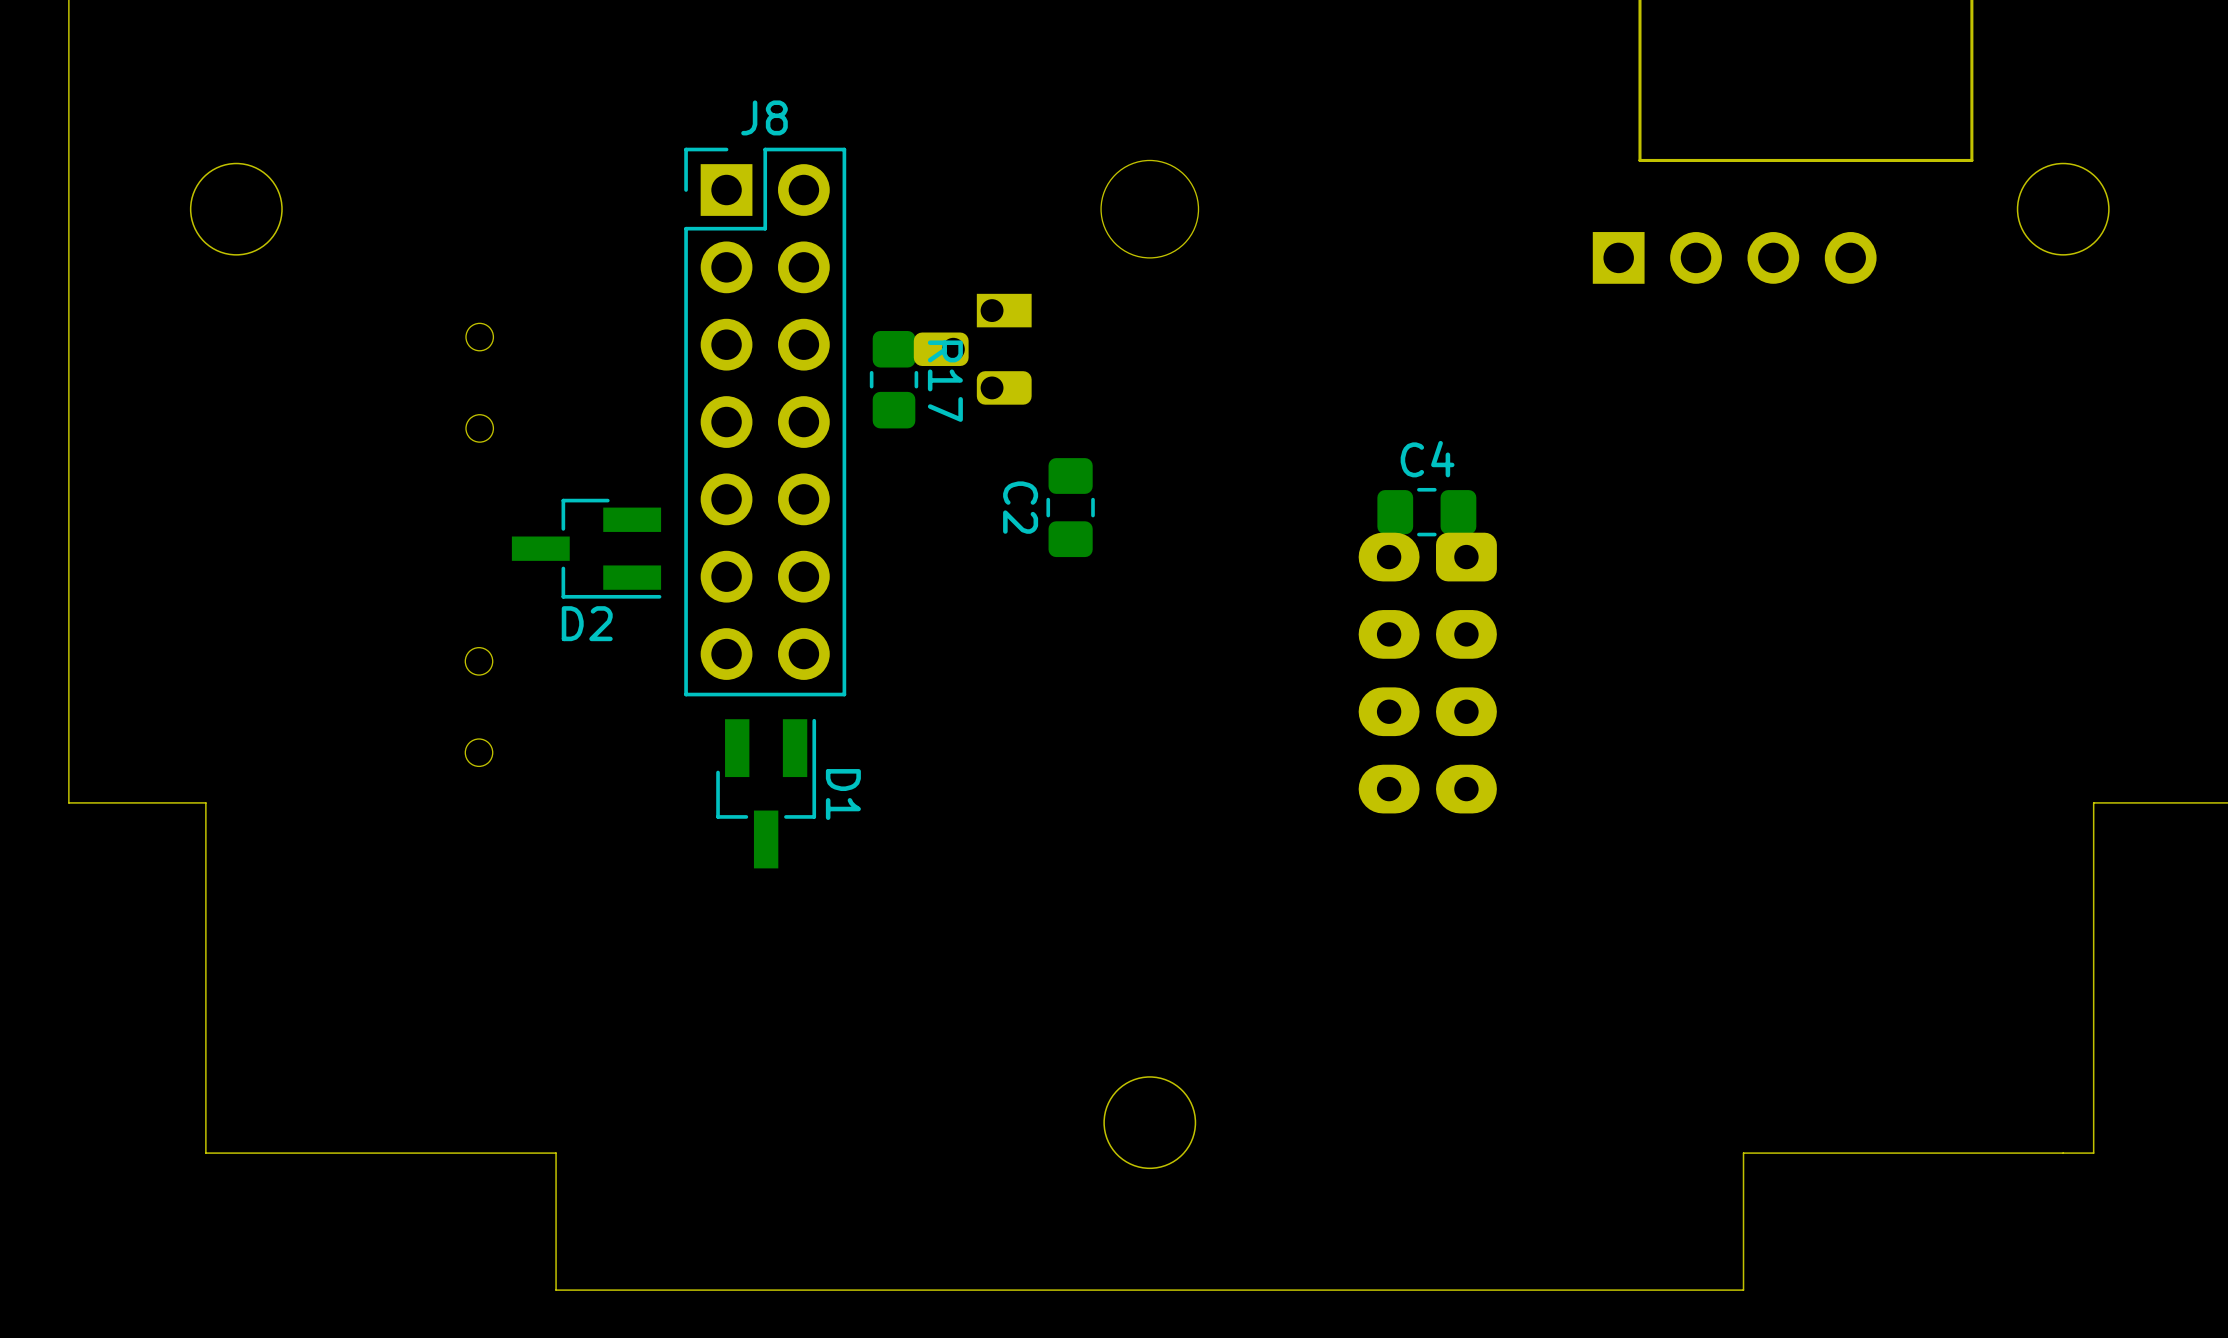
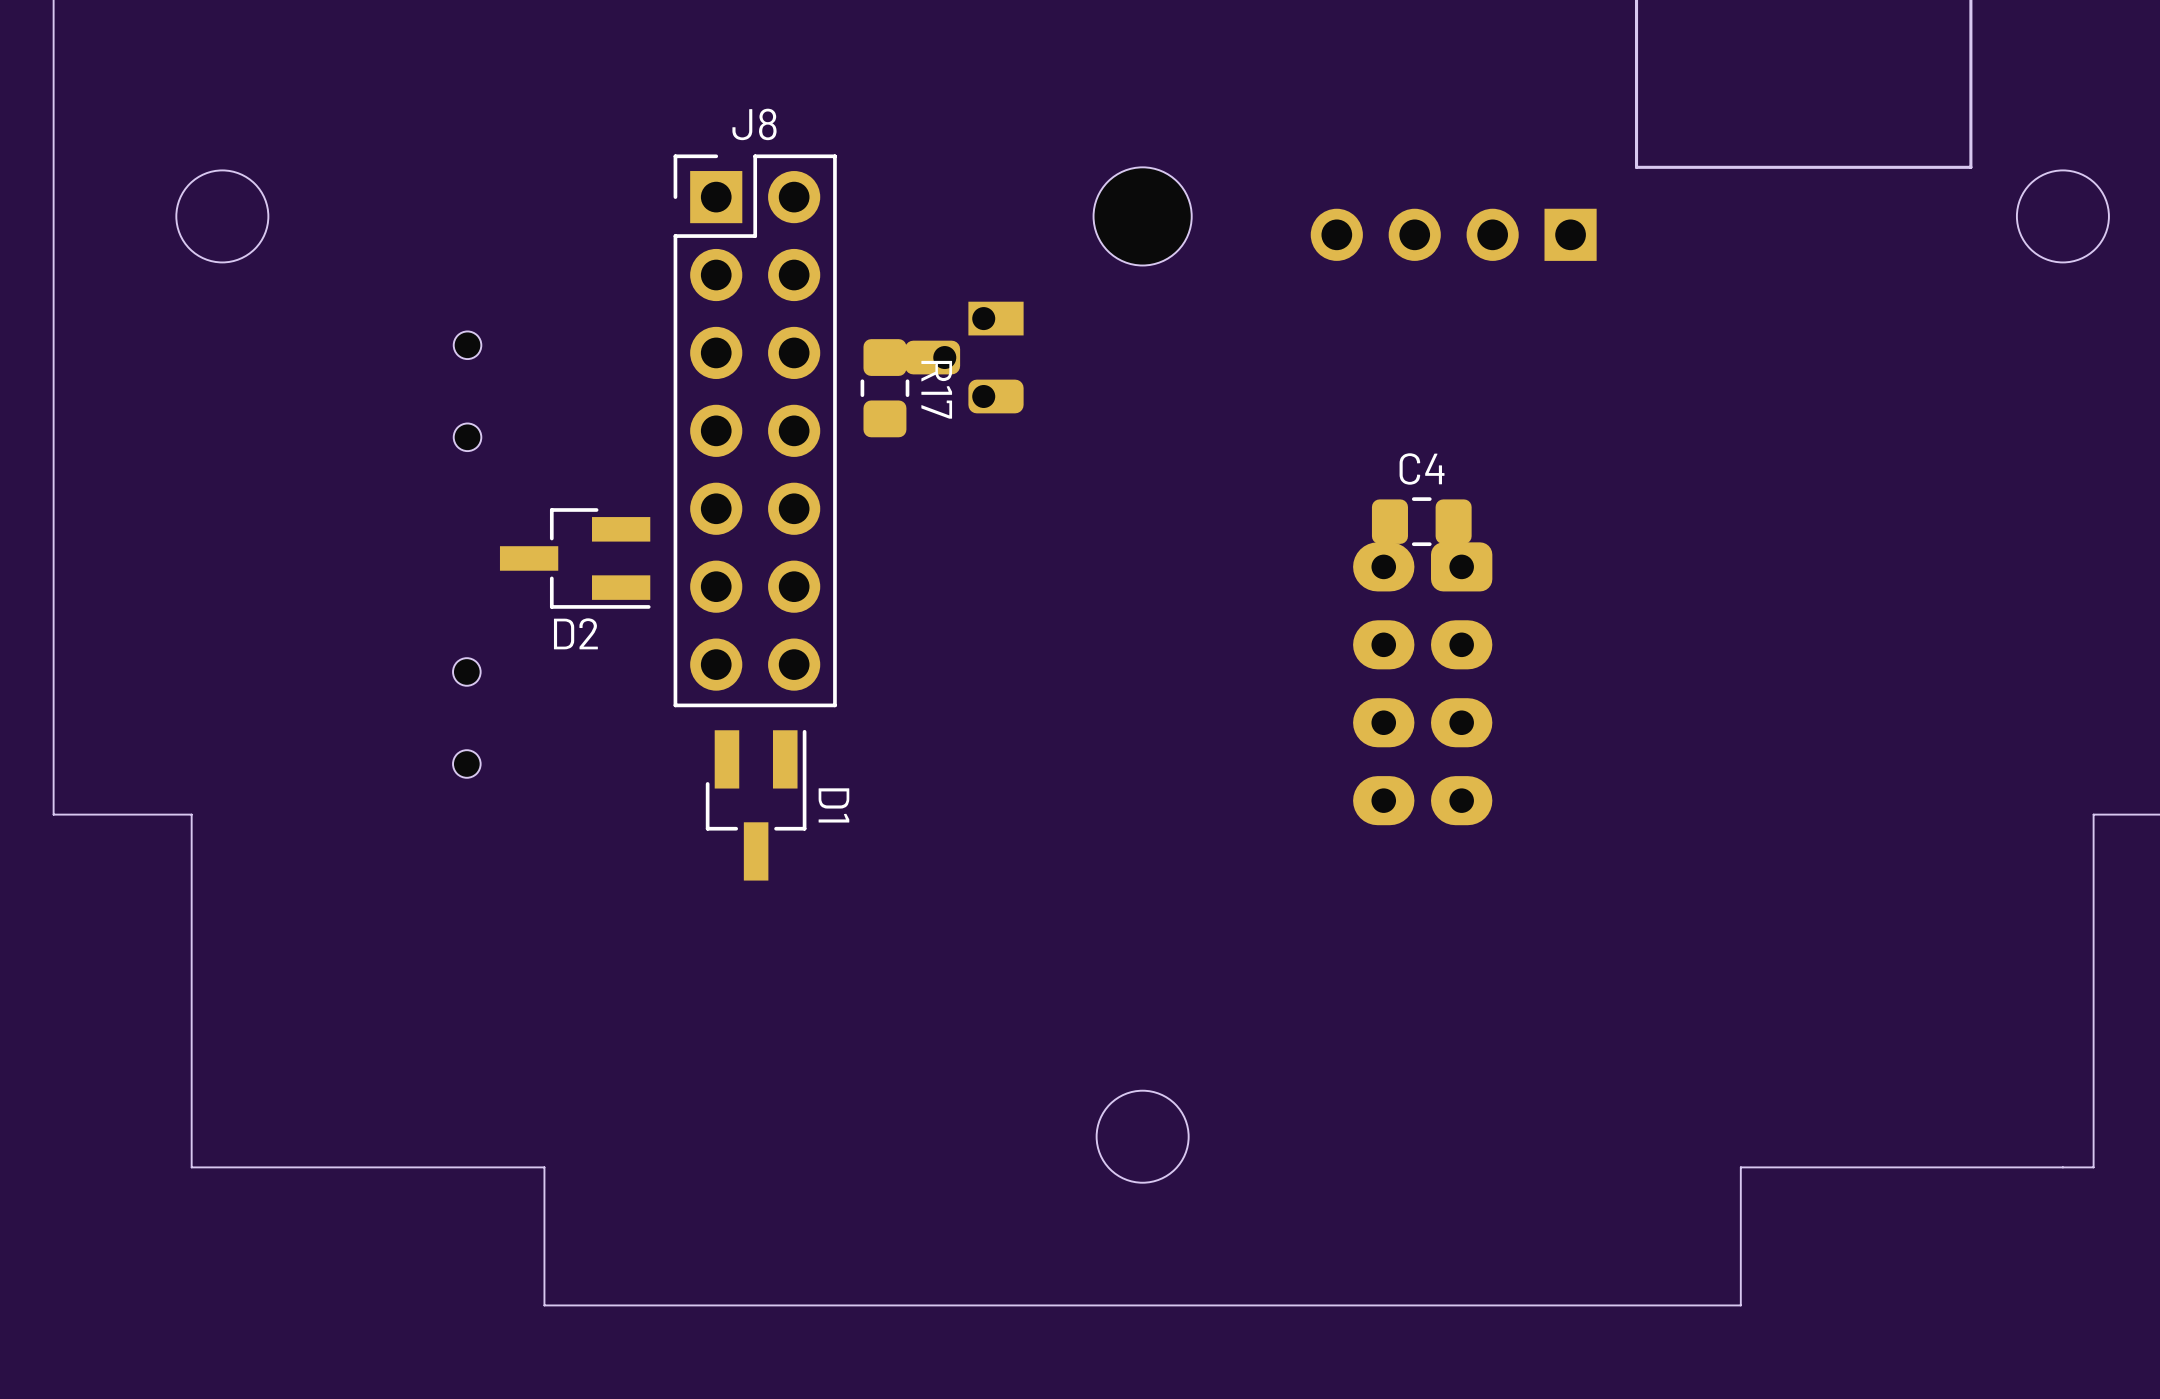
part rotation: 0° (1734, 257) -> 180° (1453, 234)
part position: (1734, 257) -> (1453, 234)
C2: (1070, 507) -> none

